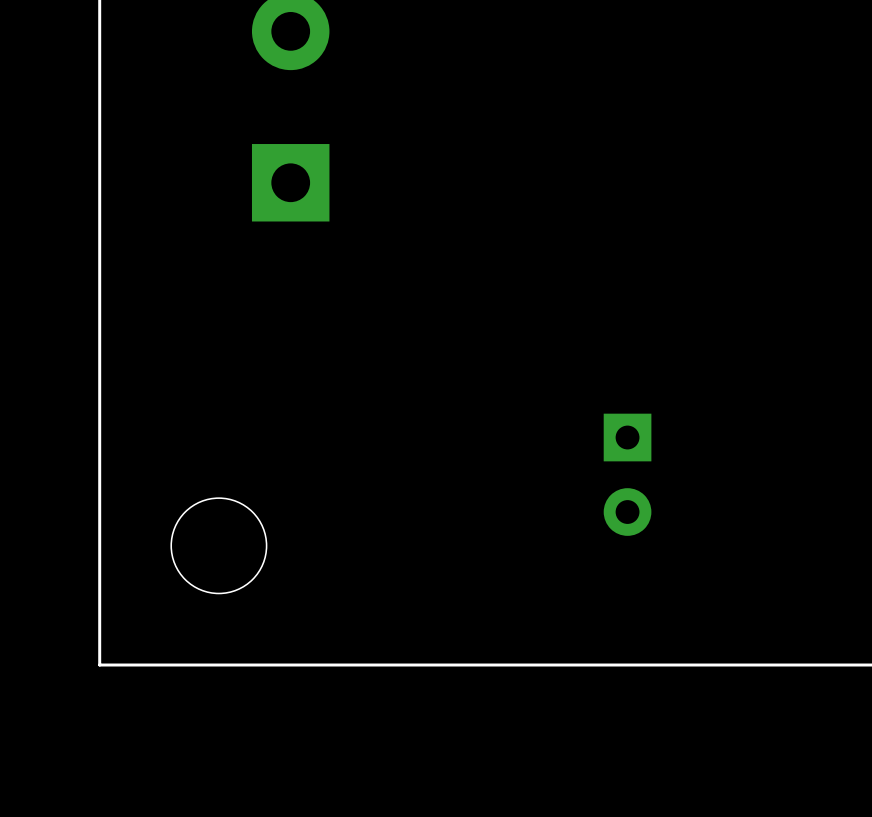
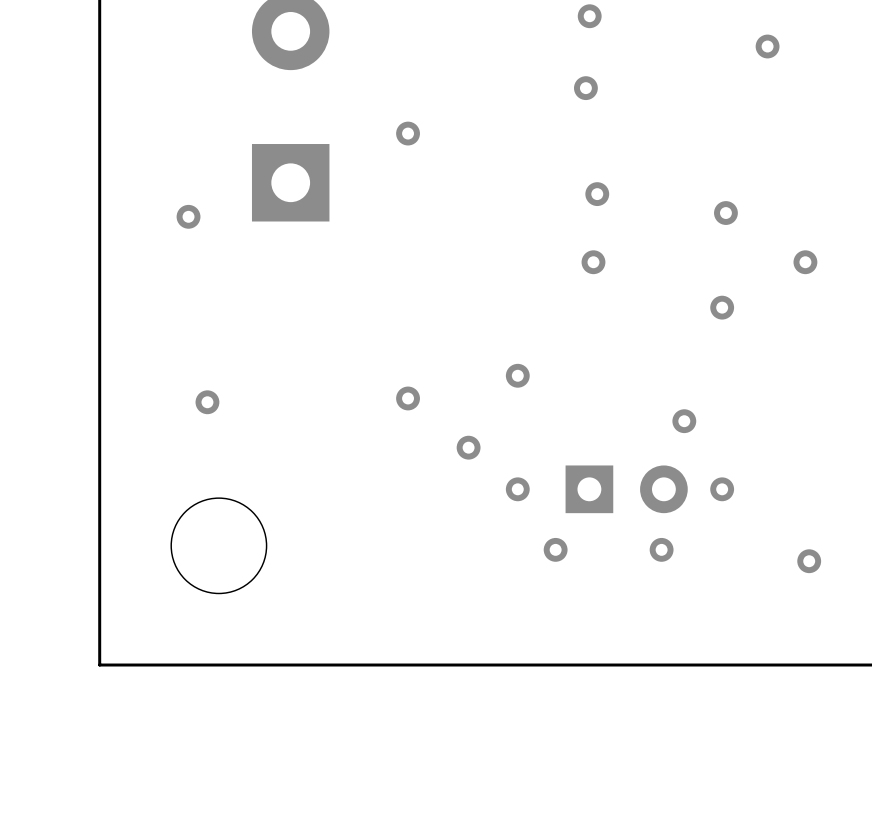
via: none -> (589, 16)
via: none -> (767, 46)
via: none -> (585, 88)
via: none -> (408, 133)
via: none -> (597, 194)
via: none -> (725, 213)
via: none -> (188, 216)
via: none -> (593, 262)
via: none -> (805, 262)
via: none -> (722, 307)
via: none -> (517, 375)
via: none -> (408, 398)
via: none -> (207, 402)
via: none -> (684, 421)
via: none -> (468, 447)
part rotation: 0° (627, 474) -> 90° counterclockwise (626, 489)
via: none -> (517, 489)
via: none -> (722, 489)
via: none -> (555, 549)
via: none -> (661, 549)
via: none -> (809, 561)

